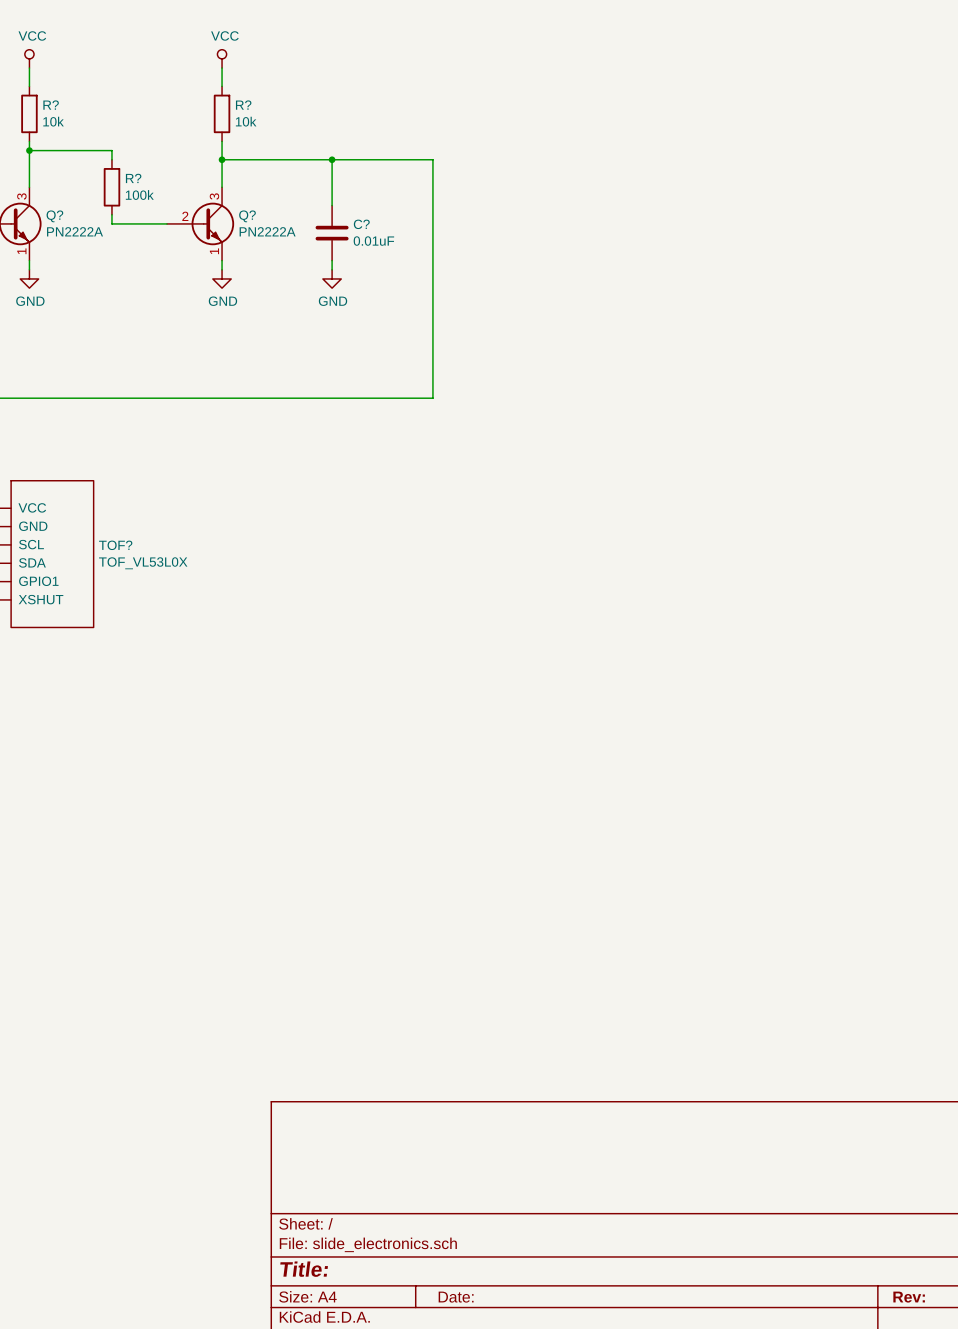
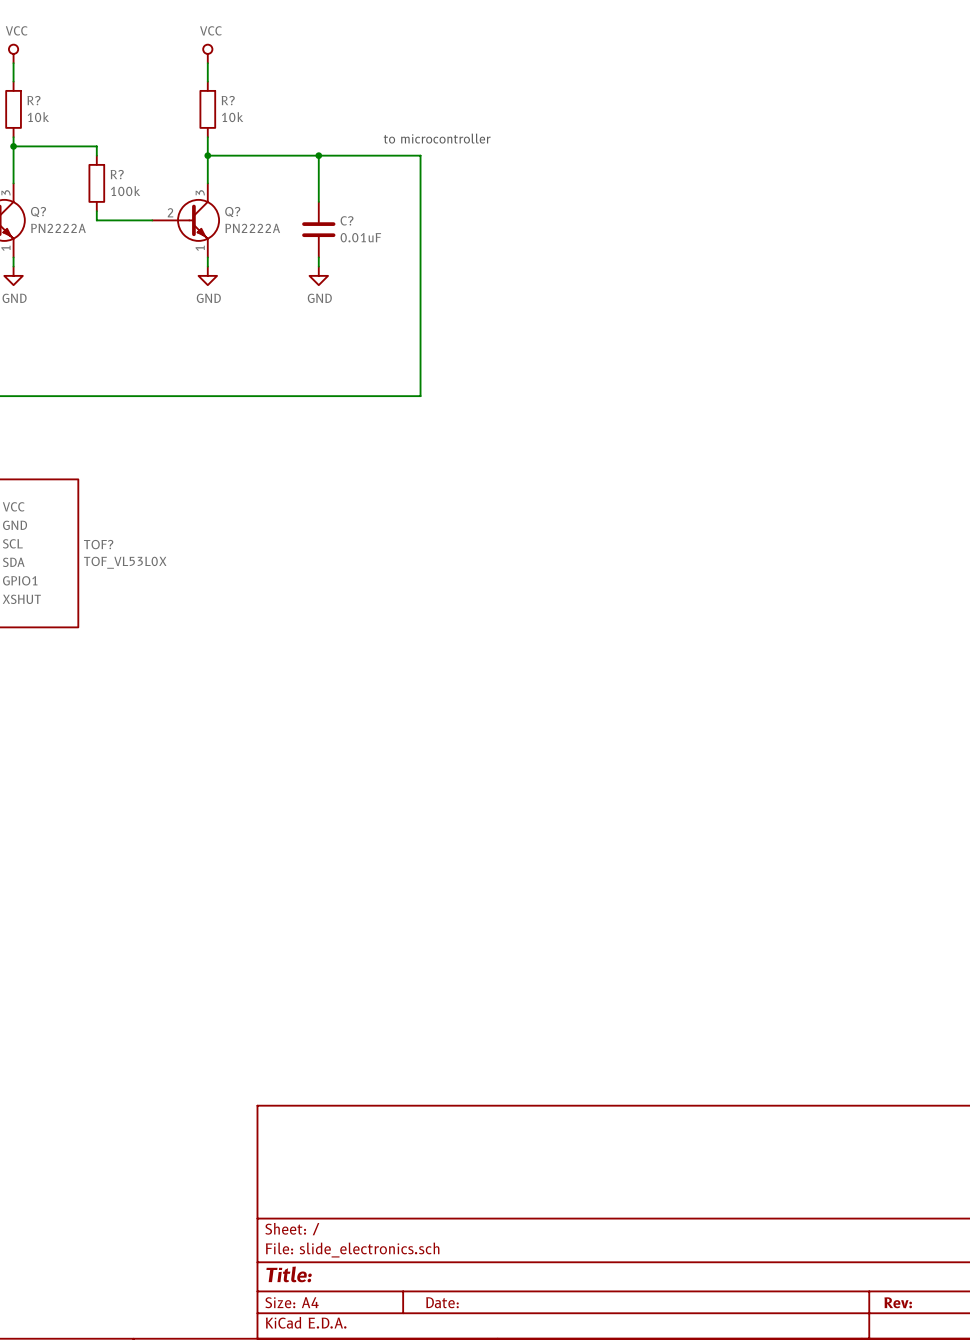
text: none -> to microcontroller (437, 138)

